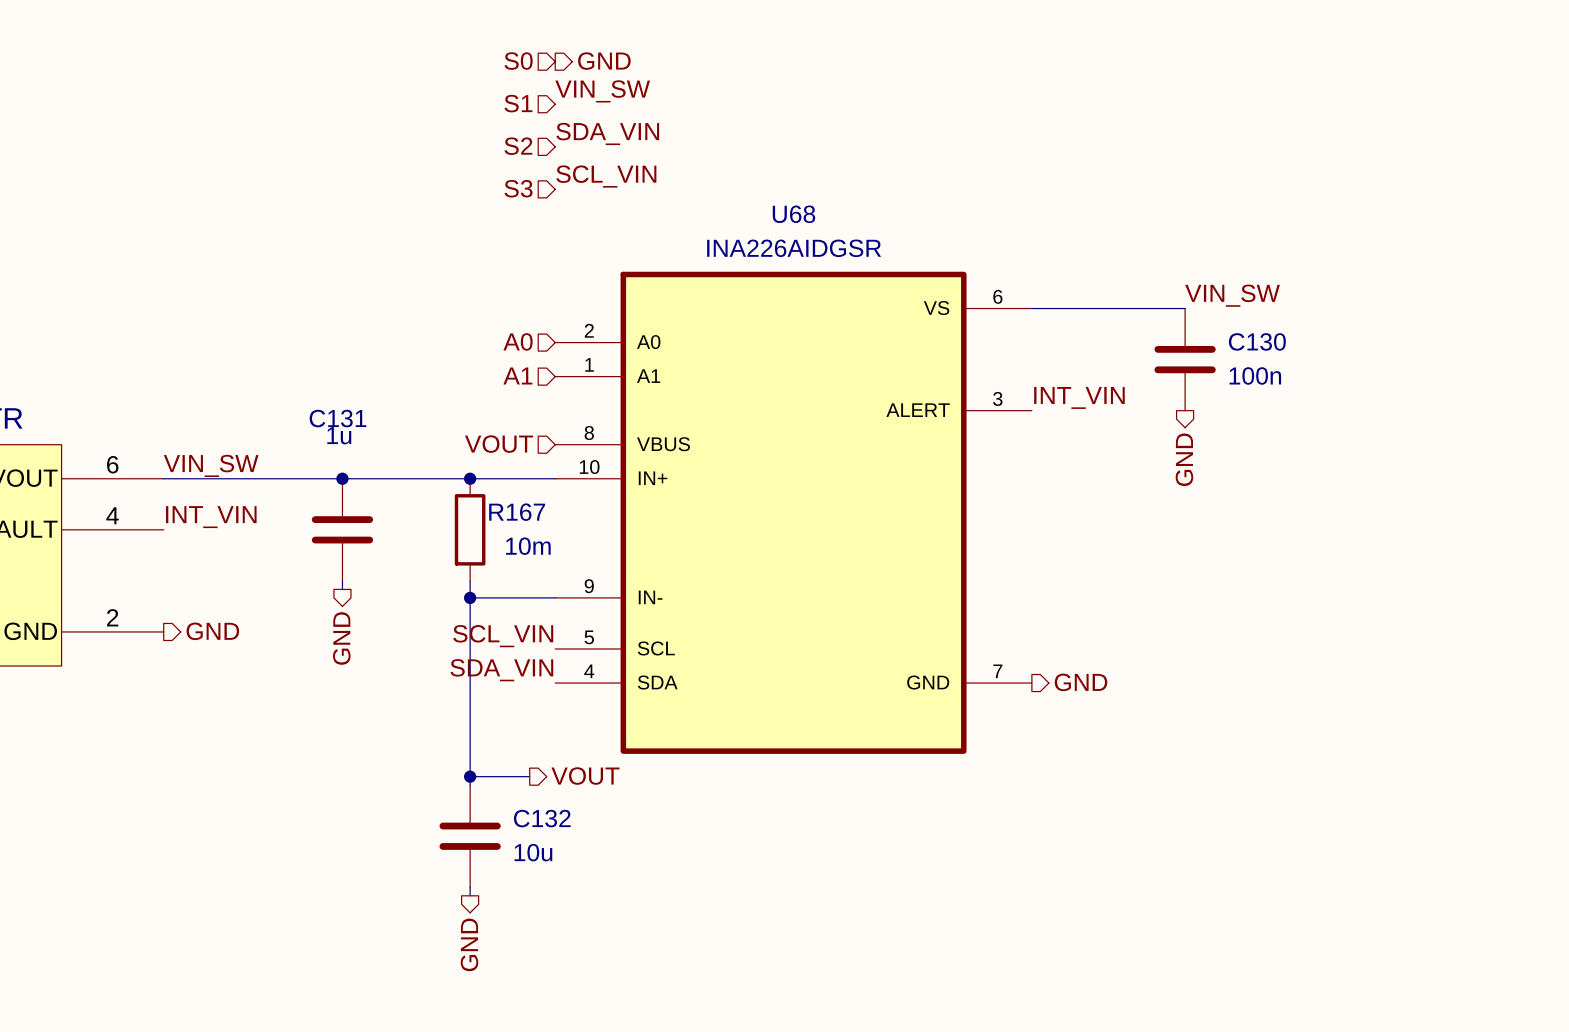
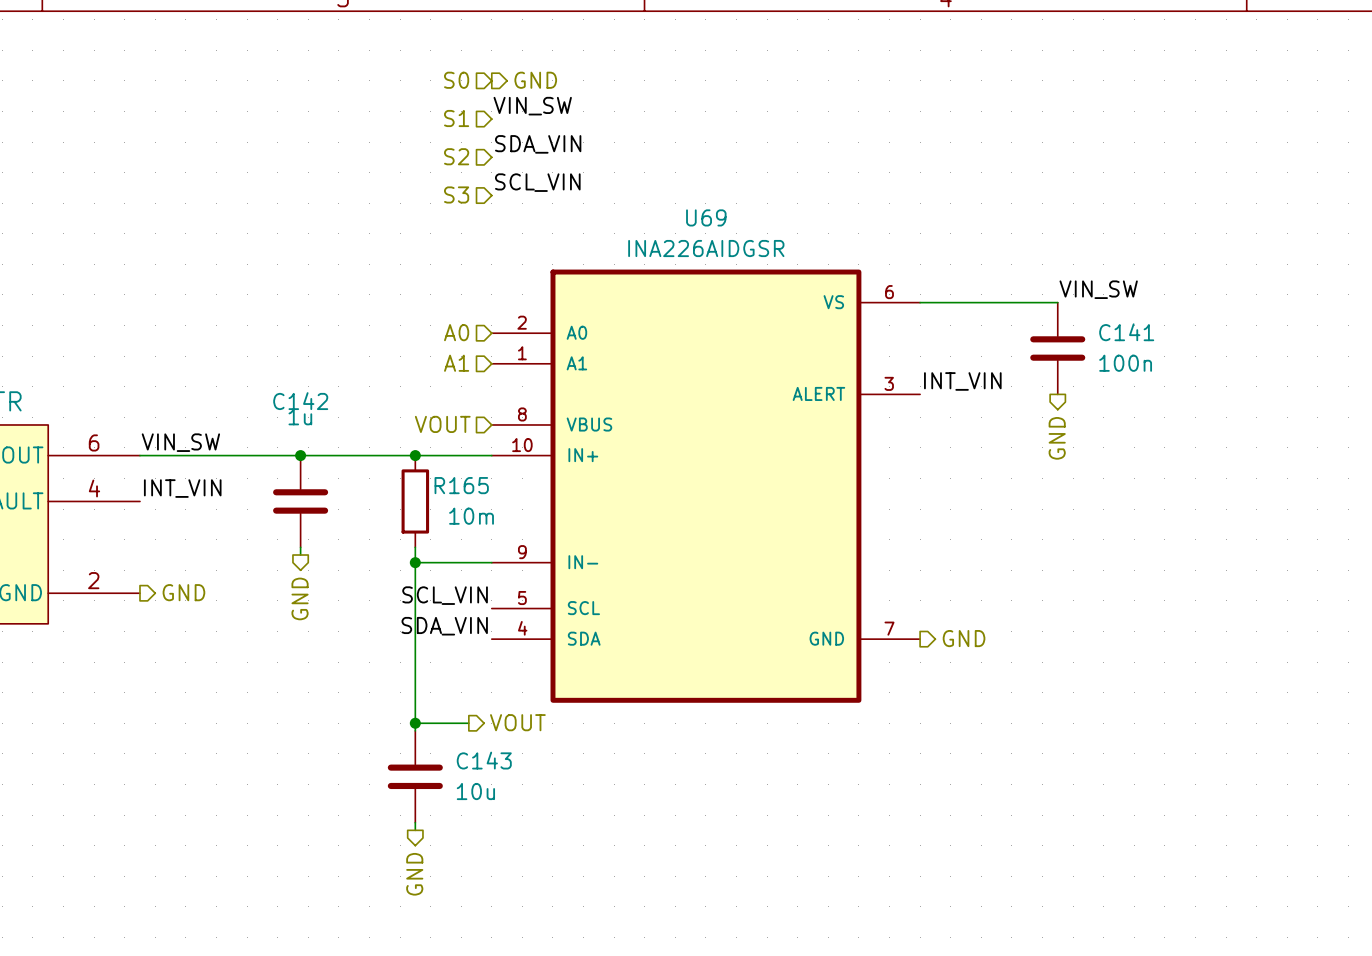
U68 name: U68 (793, 214) -> U69 (706, 217)
C130 name: C130 (1257, 341) -> C141 (1126, 332)
C131 name: C131 (338, 418) -> C142 (300, 401)
R167 name: R167 (517, 512) -> R165 (461, 485)
C132 name: C132 (542, 818) -> C143 (484, 760)

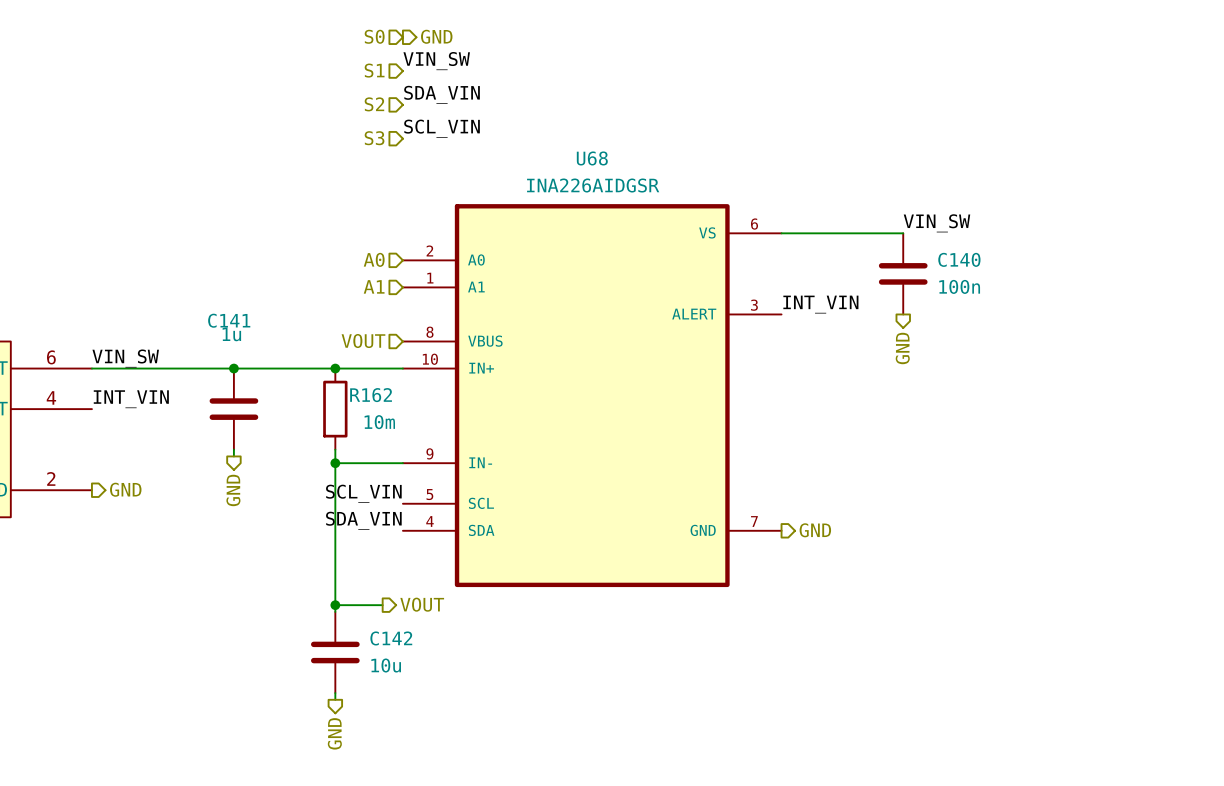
U69 name: U69 (706, 217) -> U68 (592, 158)
C141 name: C141 (1126, 332) -> C140 (959, 259)
C142 name: C142 (300, 401) -> C141 (229, 320)
R165 name: R165 (461, 485) -> R162 (371, 395)
C143 name: C143 (484, 760) -> C142 (391, 638)

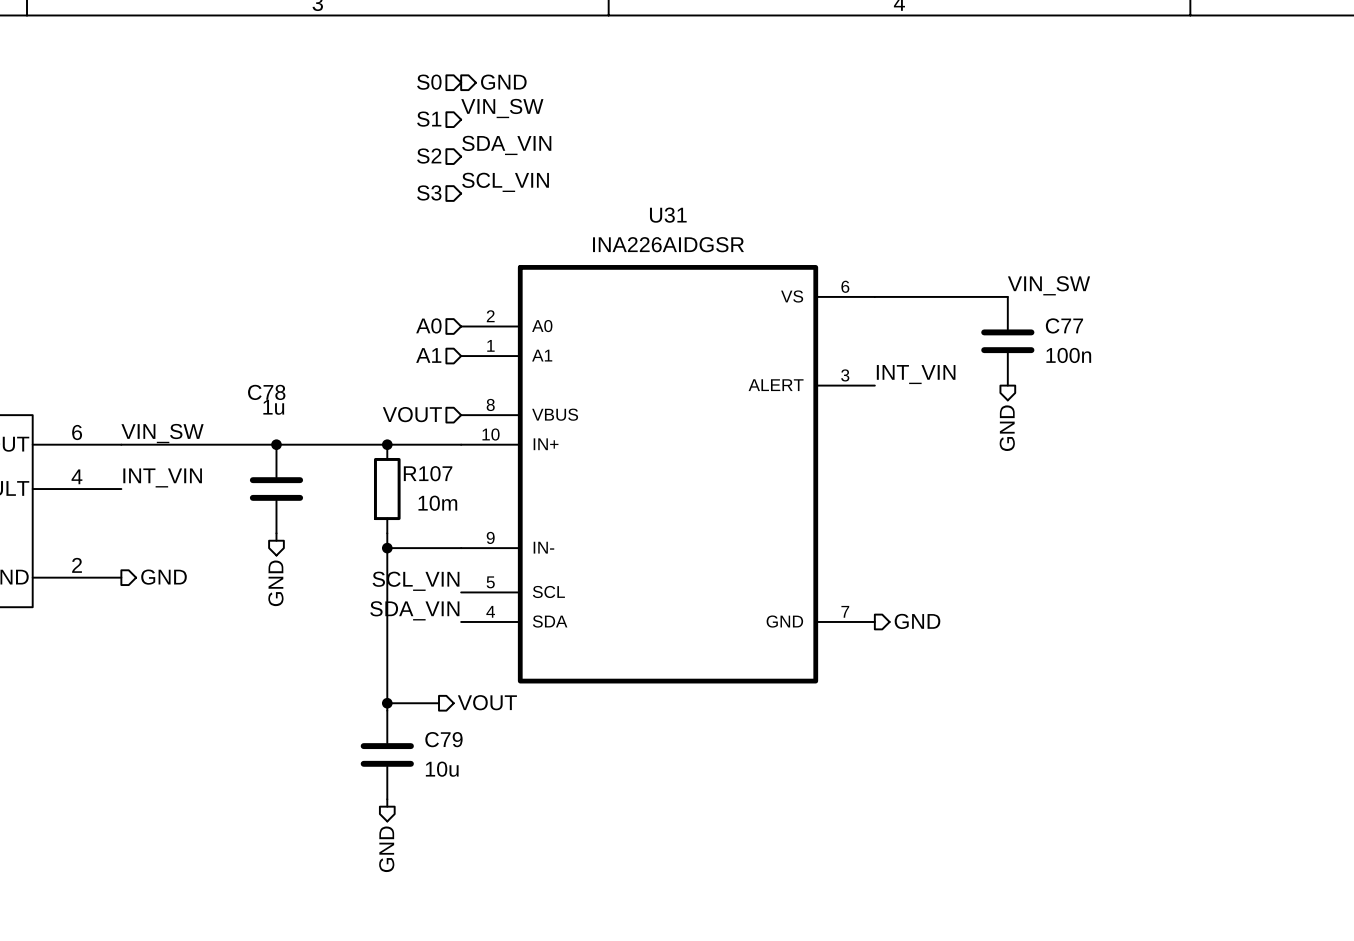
U68 name: U68 (592, 158) -> U31 (668, 215)
C140 name: C140 (959, 259) -> C77 (1064, 325)
C141 name: C141 (229, 320) -> C78 (266, 392)
R162 name: R162 (371, 395) -> R107 (428, 473)
C142 name: C142 (391, 638) -> C79 (443, 739)

